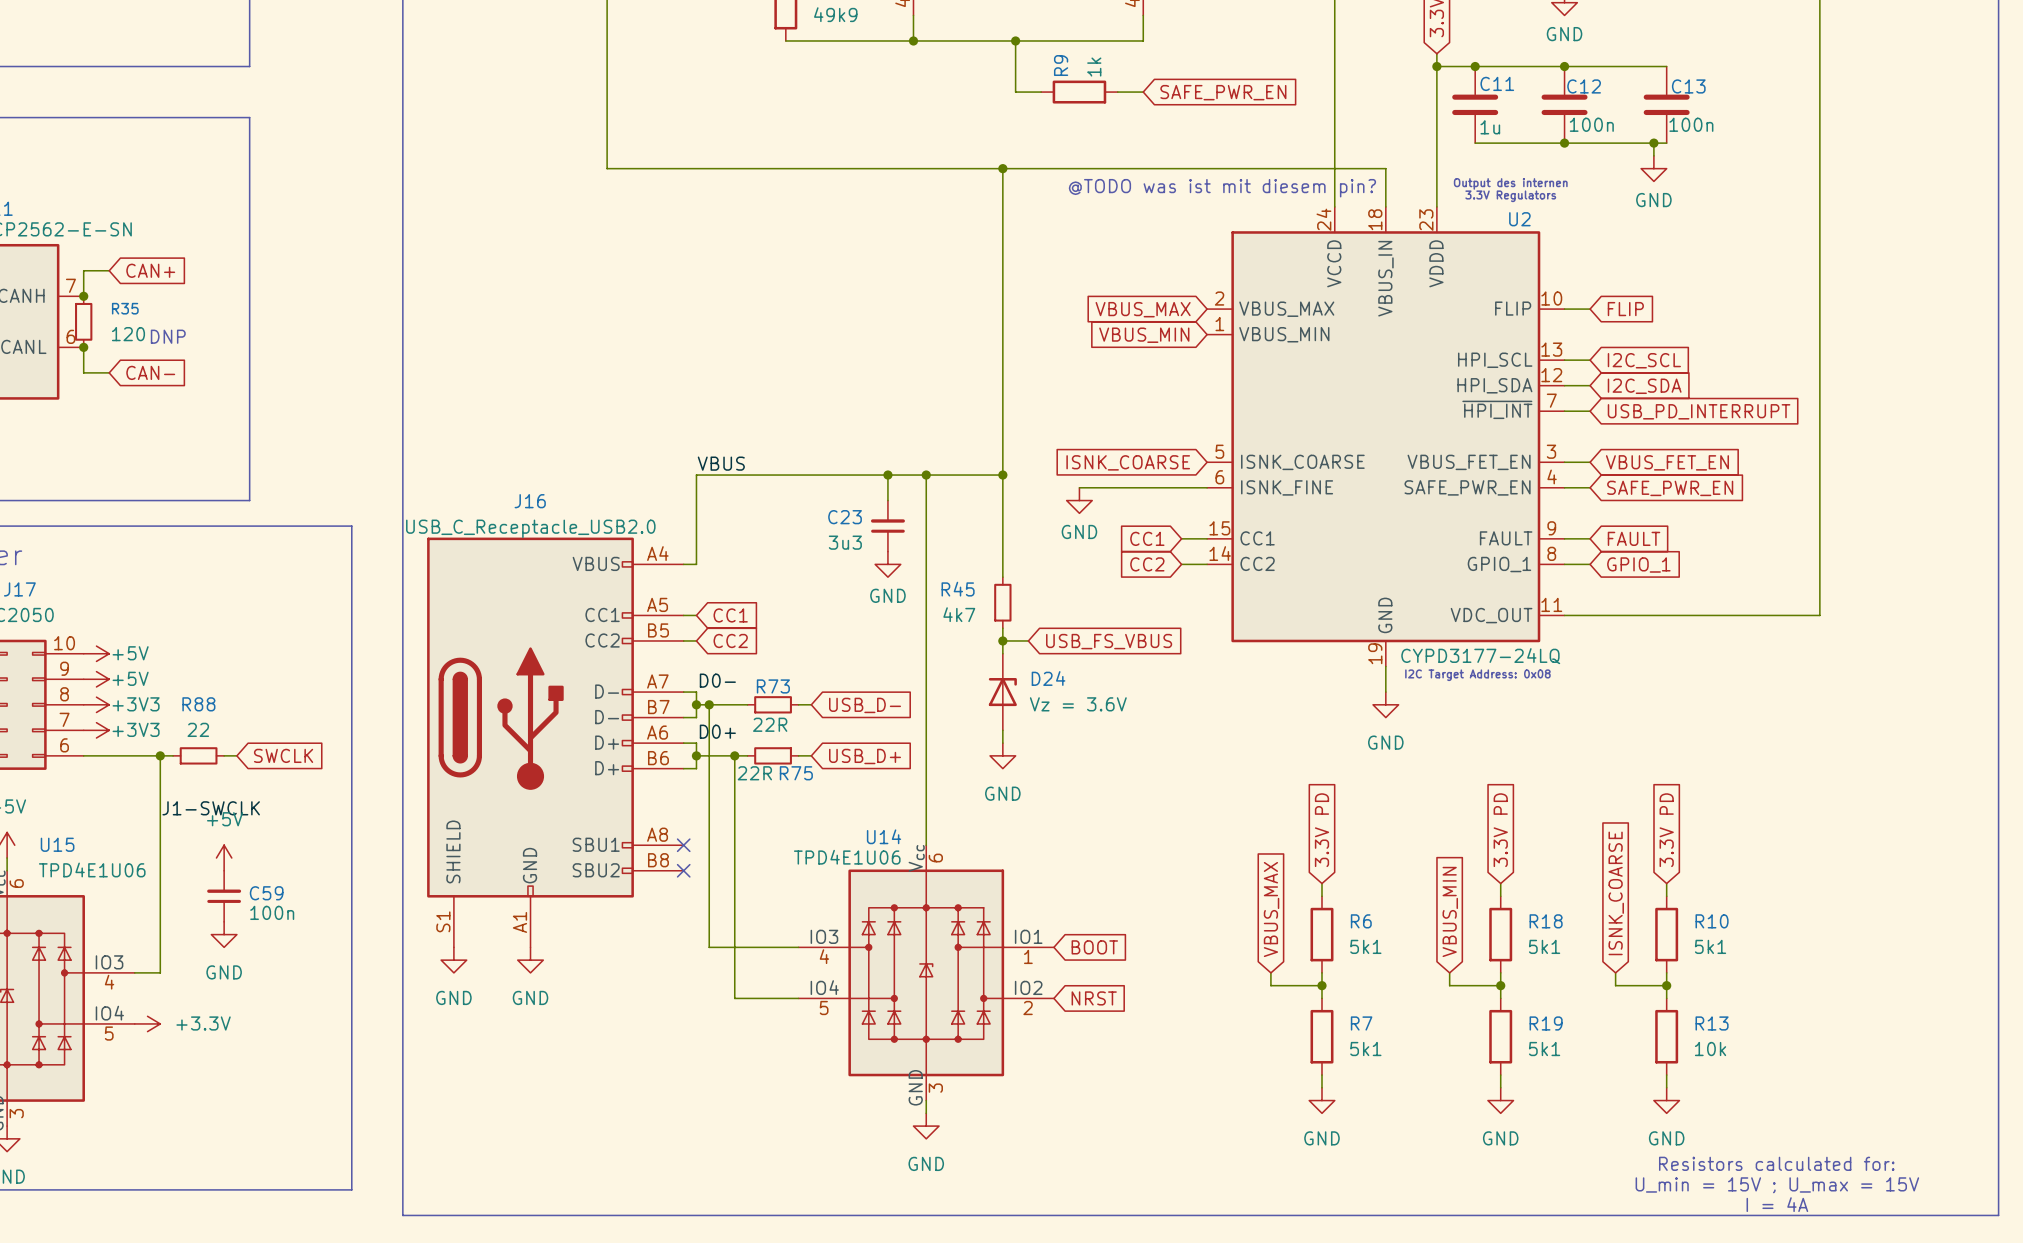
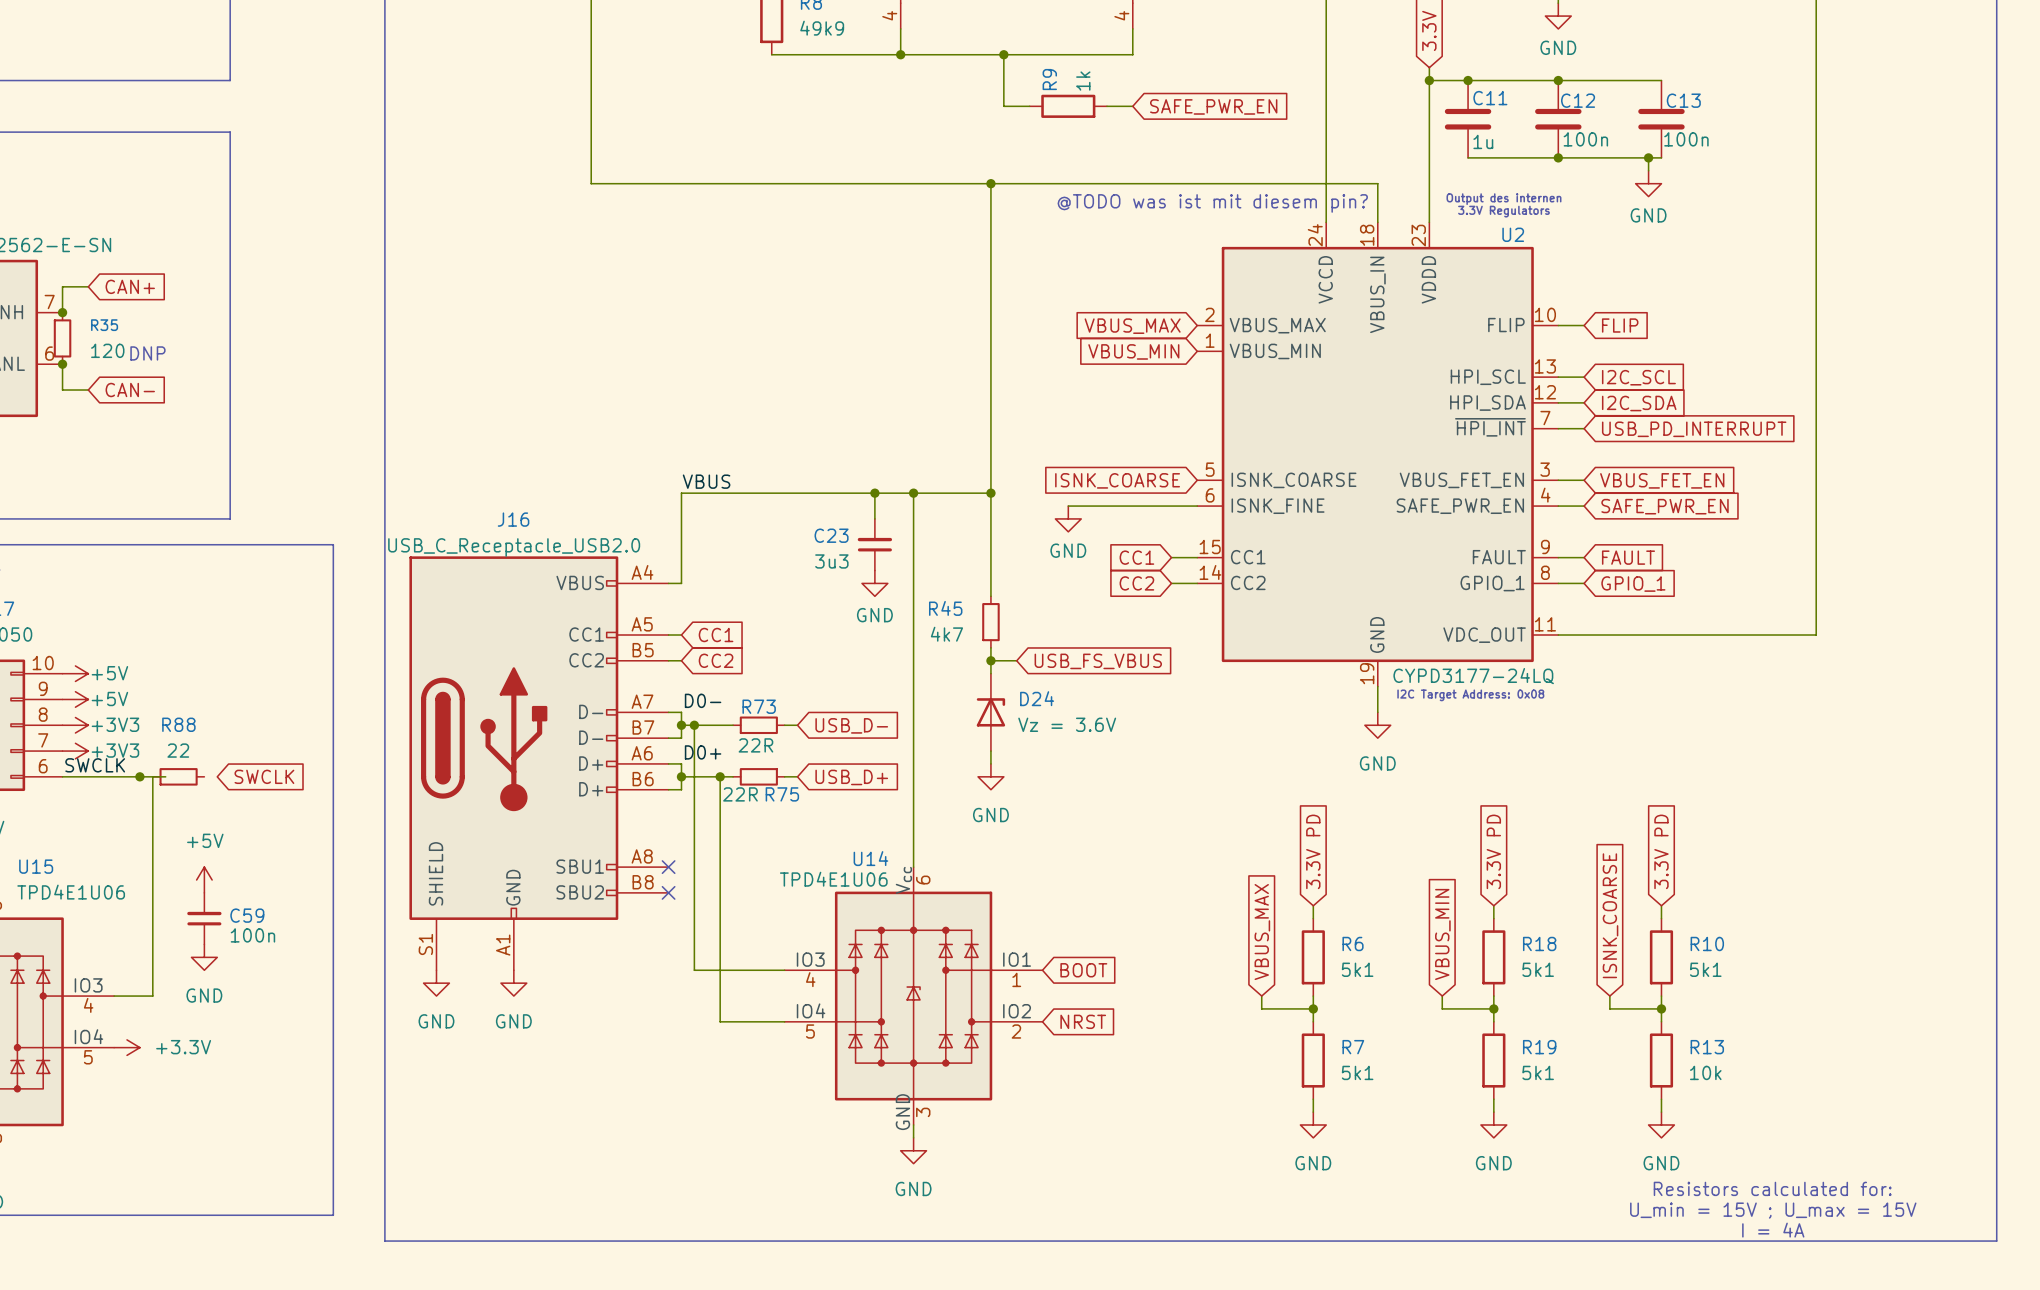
label: none -> SWCLK (95, 765)
wire: (160, 755) (160, 972) -> (165, 776) (152, 776) (152, 996) (139, 996)
wire: (224, 755) (236, 755) -> none
label: J1-SWCLK (211, 808) -> none

